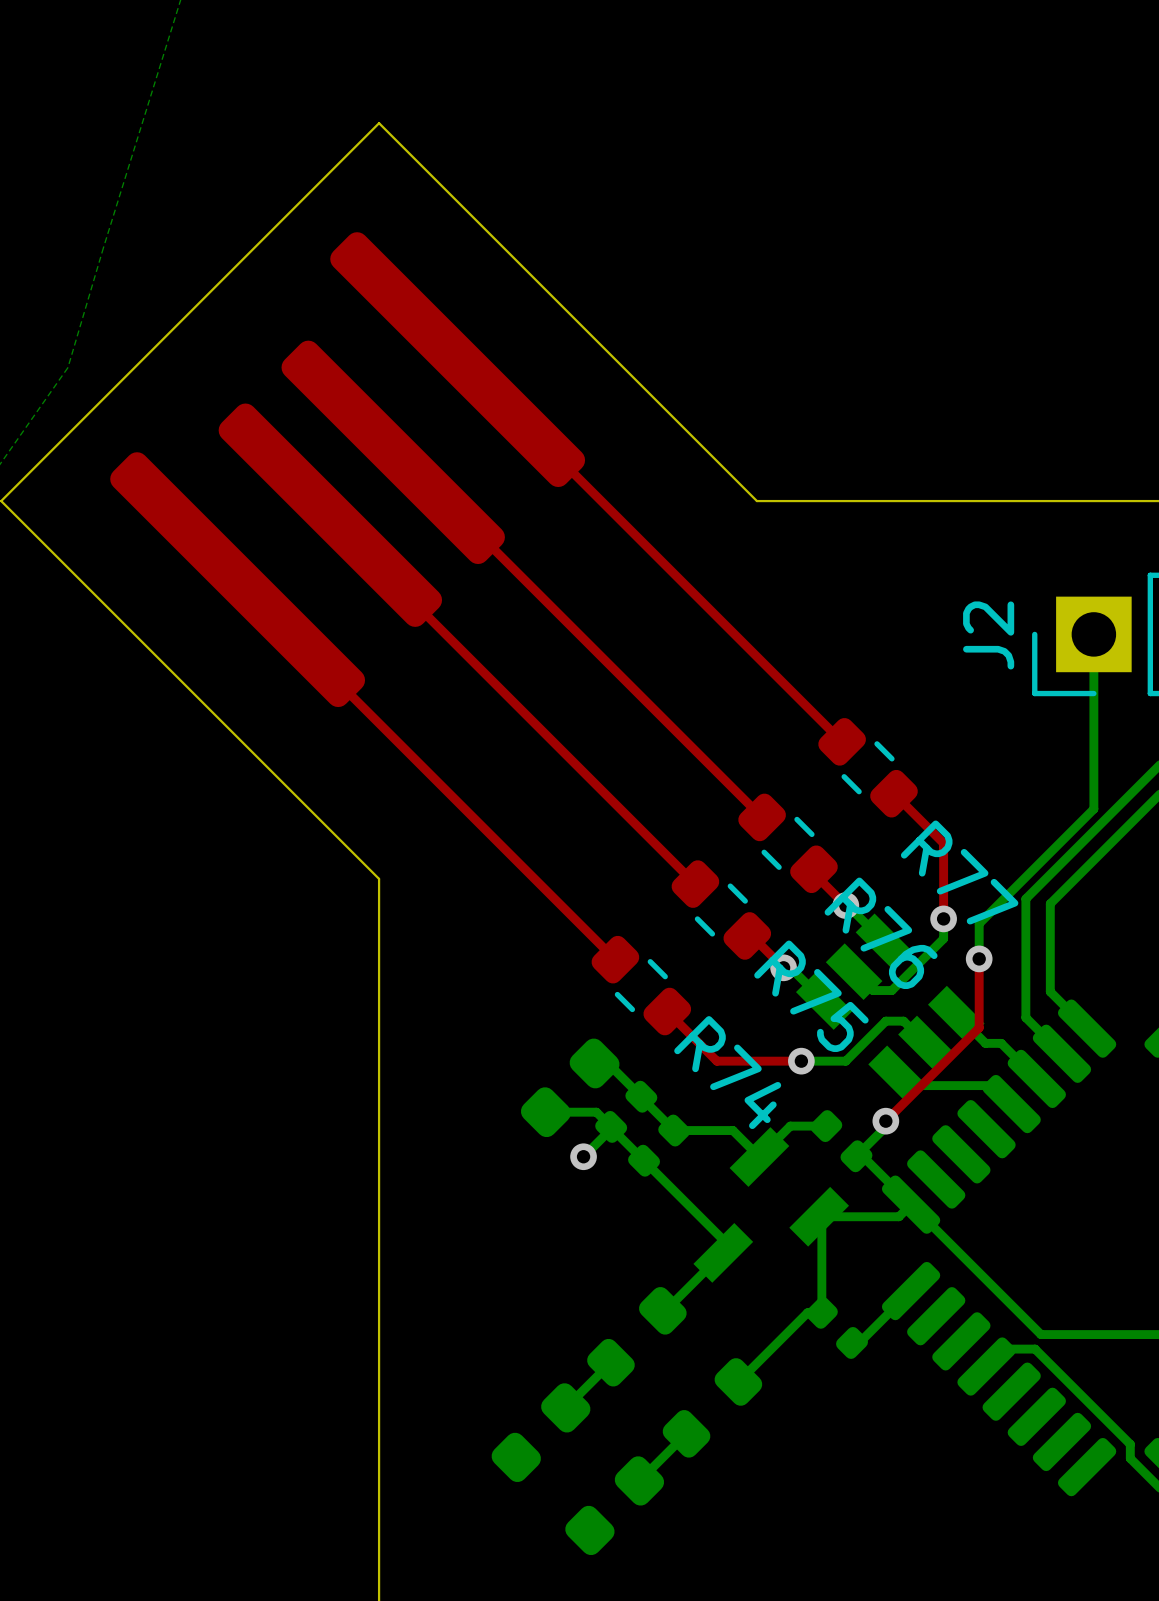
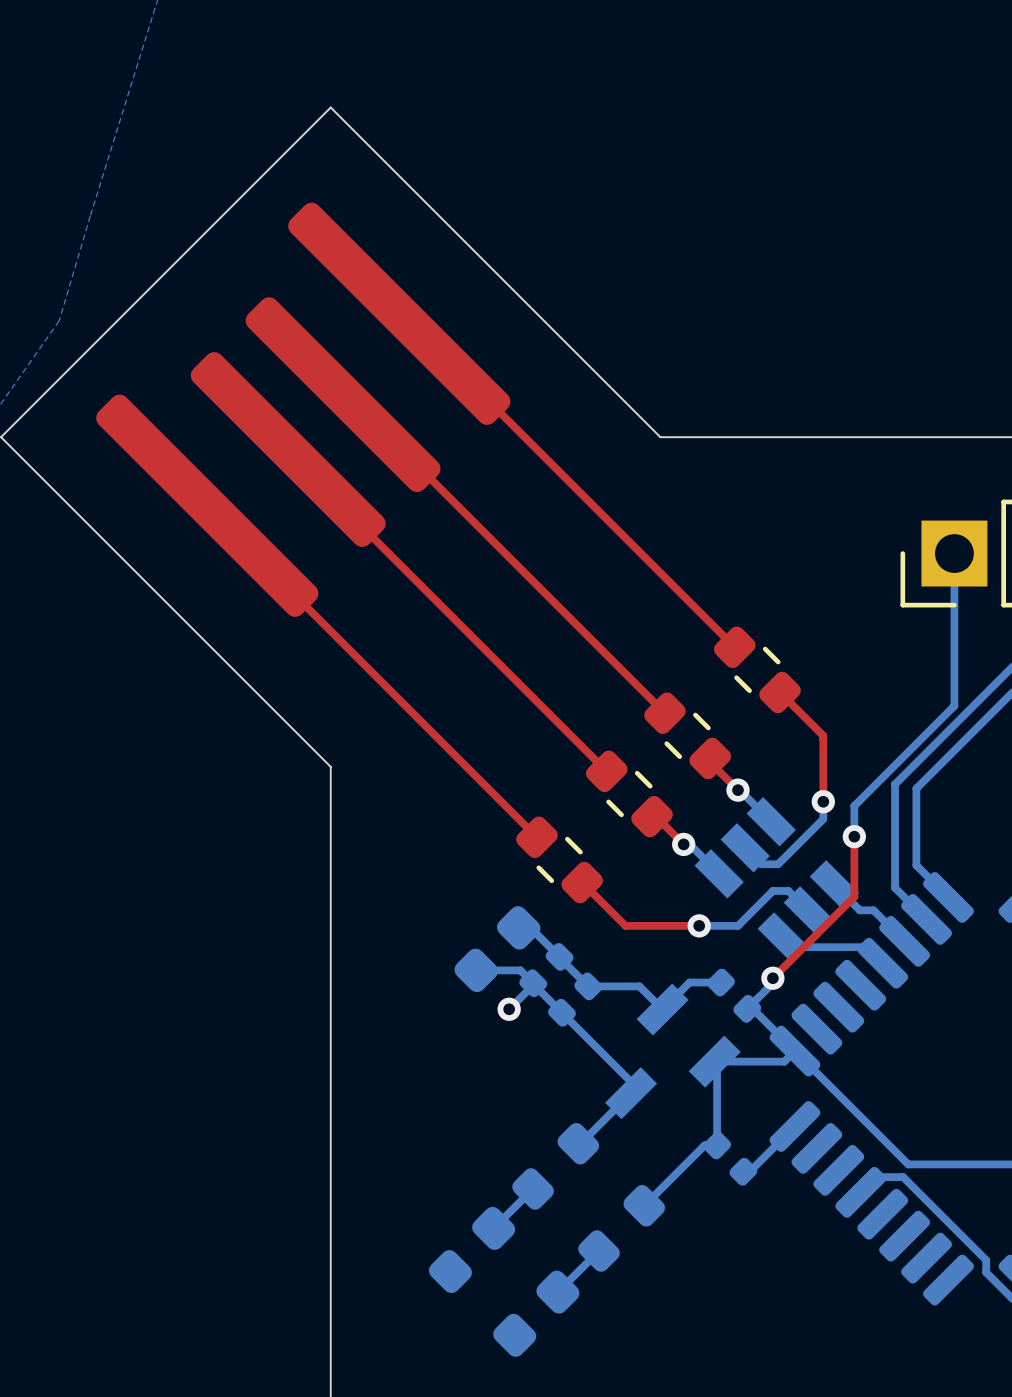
J2 name: J2 (988, 635) -> none
R77 name: R77 (959, 872) -> none
R76 name: R76 (881, 933) -> none
R75 name: R75 (811, 996) -> none
R74 name: R74 (727, 1072) -> none

